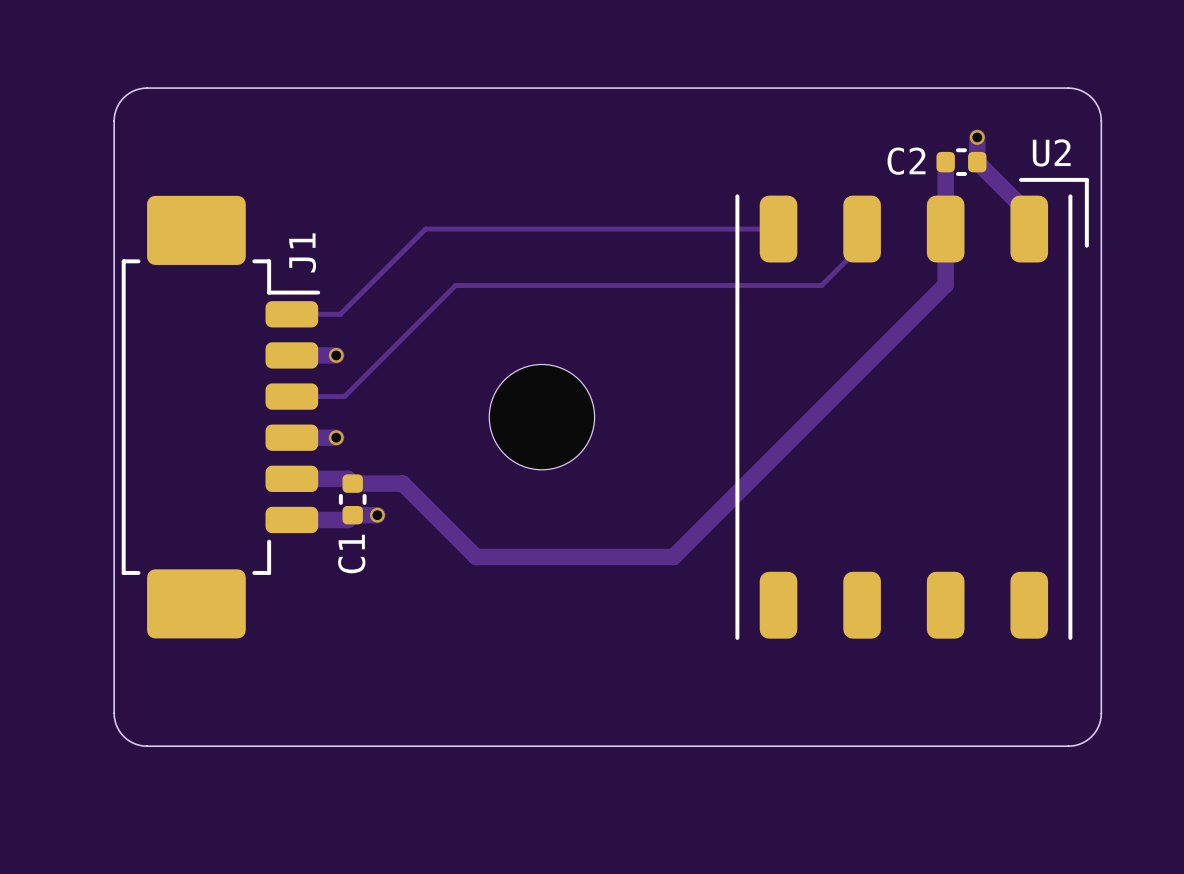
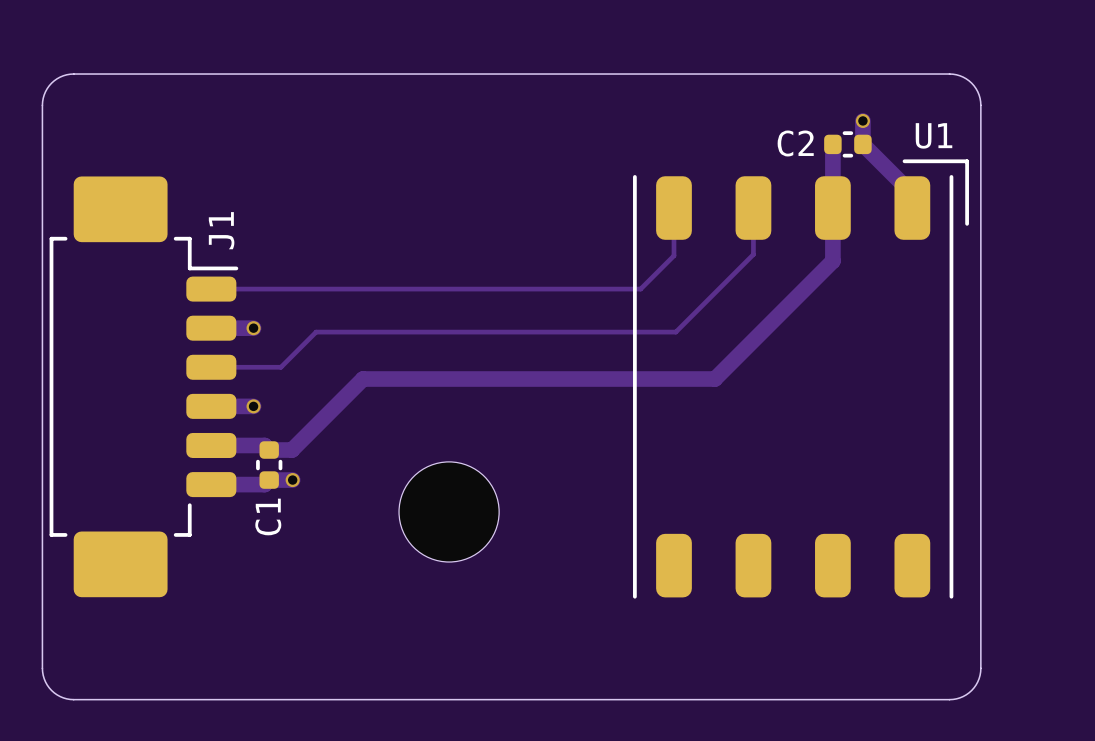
U2 name: U2 (1051, 152) -> U1 (934, 135)
track: (778, 229) (425, 229) (340, 314) -> (673, 208) (673, 255) (640, 289) (257, 289)
track: (862, 245) (821, 285) (455, 285) (344, 396) -> (753, 223) (753, 254) (675, 332) (316, 332) (280, 367) (261, 367)
track: (821, 408) (673, 556) (476, 556) (402, 483) (376, 483) -> (714, 379) (363, 379) (292, 450)
part position: (541, 417) -> (449, 511)

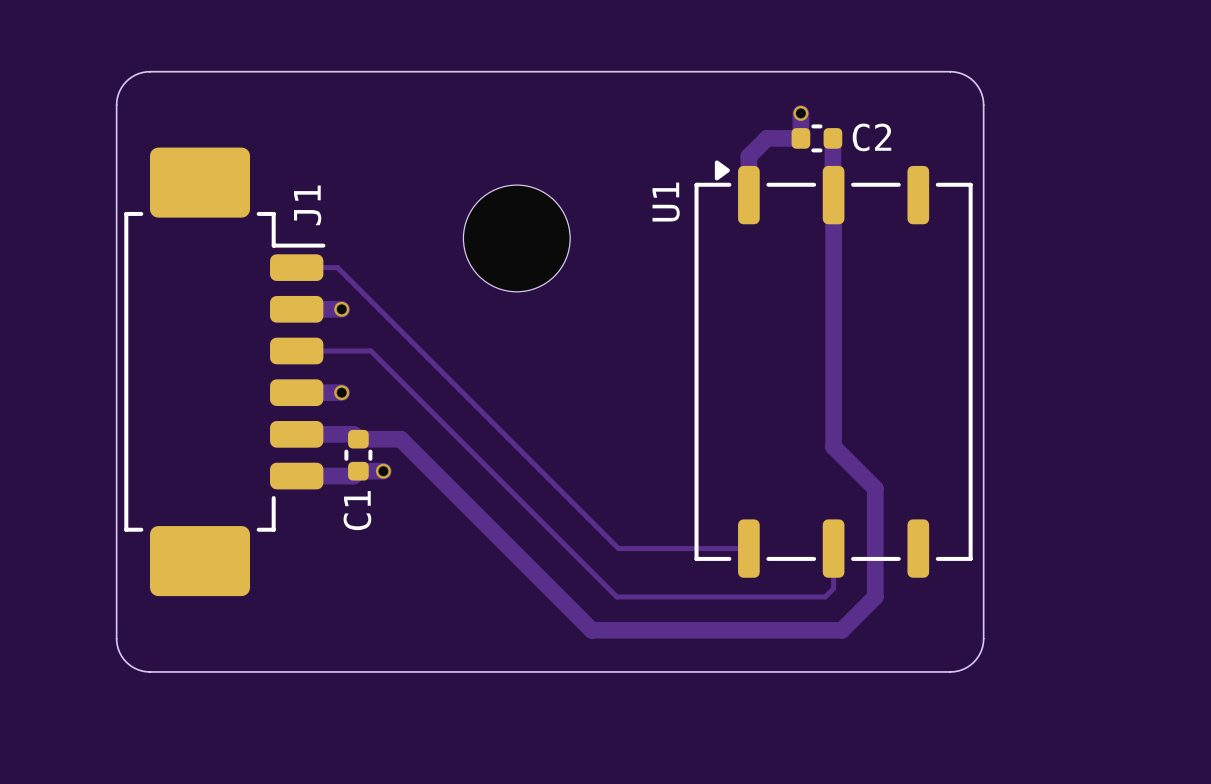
track: (862, 120) (862, 144) (912, 193) (912, 208) -> none
via position: (862, 120) -> (800, 113)
U1 name position: U1 (934, 135) -> U1 (666, 202)
board edge: (42, 136) (42, 101) (45, 91) (57, 78) (73, 74) (949, 74) (959, 75) (971, 83) (977, 91) (980, 105) (980, 668) (977, 681) (966, 694) (949, 699) (70, 699) (57, 694) (45, 681) (42, 671) (42, 637) -> (116, 105) (118, 94) (126, 81) (138, 73) (149, 71) (950, 71) (964, 75) (973, 81) (981, 94) (983, 105) (983, 638) (978, 656) (968, 666) (950, 671) (149, 671) (135, 668) (126, 662) (119, 653) (116, 638)
C2 name position: C2 (795, 143) -> C2 (871, 137)
track: none -> (800, 113) (800, 138) (766, 138) (748, 156) (748, 195)
track: (832, 144) (832, 261) (714, 379) (363, 379) (292, 450) -> (832, 138) (833, 446) (875, 488) (875, 596) (841, 630) (591, 630) (400, 439) (382, 439)
C2 position: (847, 144) -> (816, 138)
U1 footprint: [633, 159, 969, 599] -> [694, 160, 973, 578]
track: (673, 208) (673, 255) (640, 289) (249, 289) -> (748, 548) (618, 548) (337, 267)
track: (753, 208) (753, 254) (675, 332) (316, 332) (280, 367) -> (833, 548) (833, 588) (825, 596) (616, 596) (370, 350)
part position: (449, 511) -> (516, 238)

